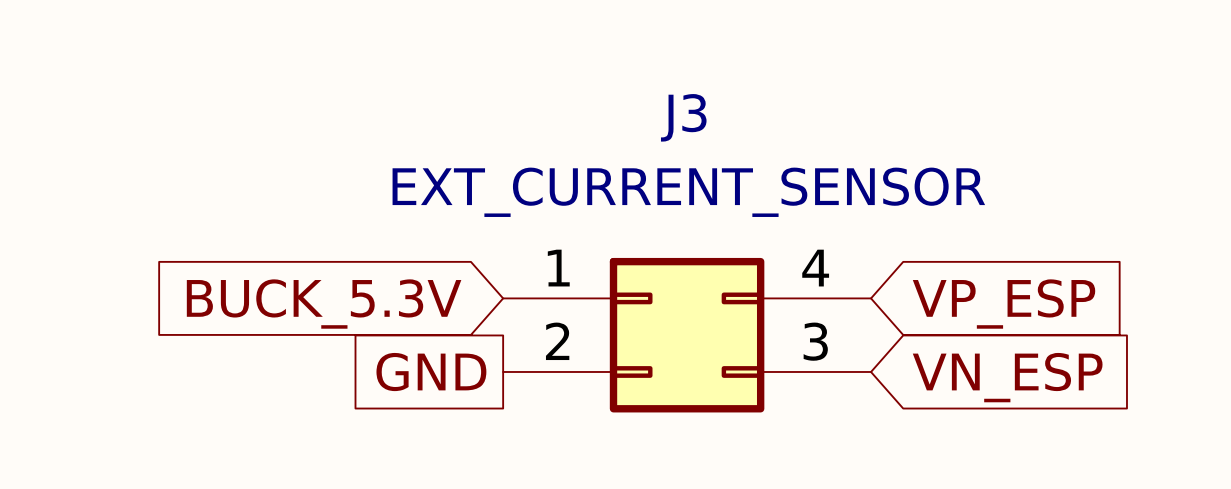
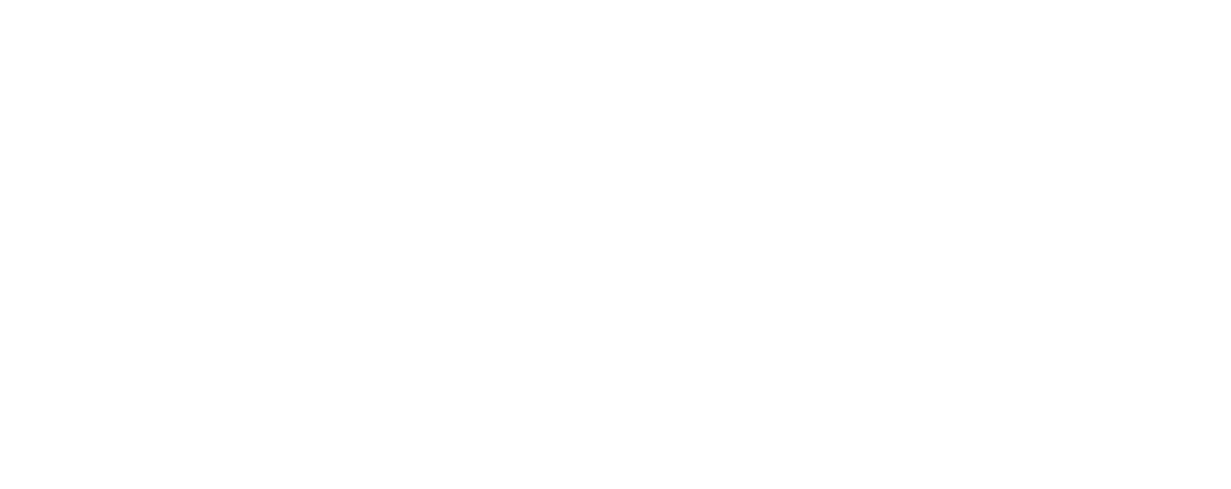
global label: BUCK_5.3V (324, 304) -> none
global label: VP_ESP (1004, 304) -> none
J3: EXT_CURRENT_SENSOR (687, 335) -> none
global label: GND (431, 372) -> none
global label: VN_ESP (1007, 377) -> none

